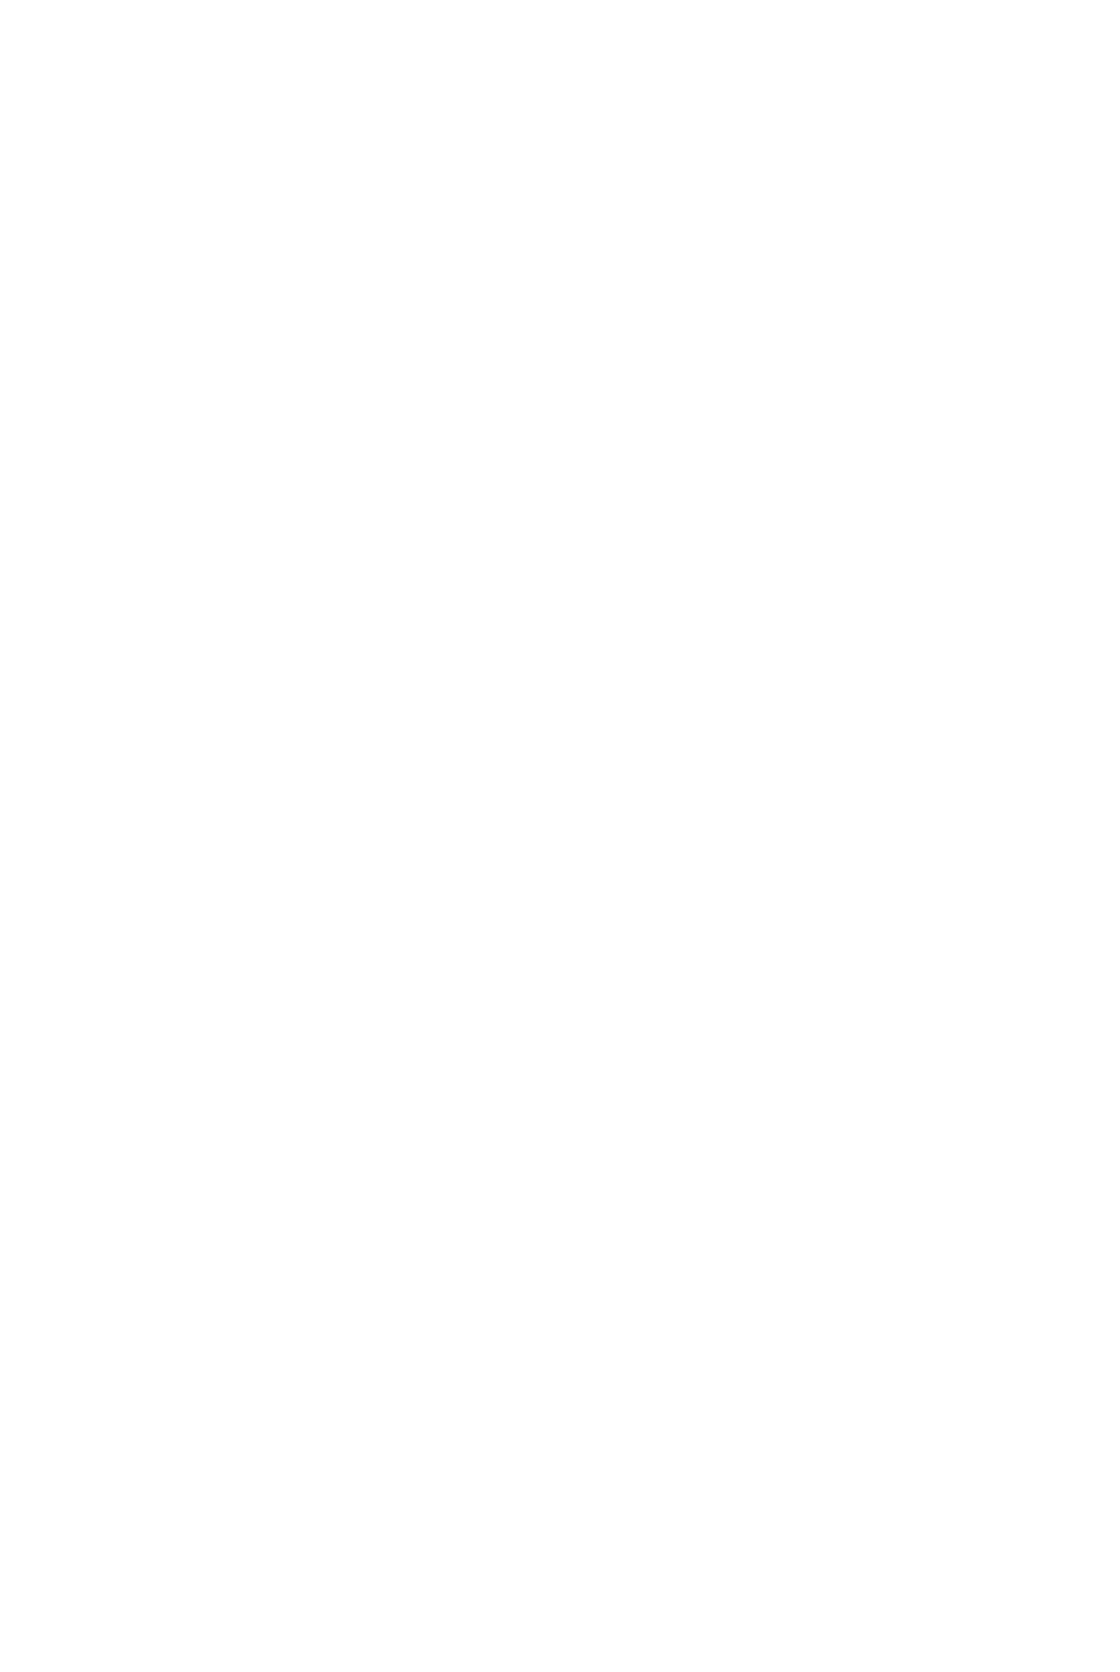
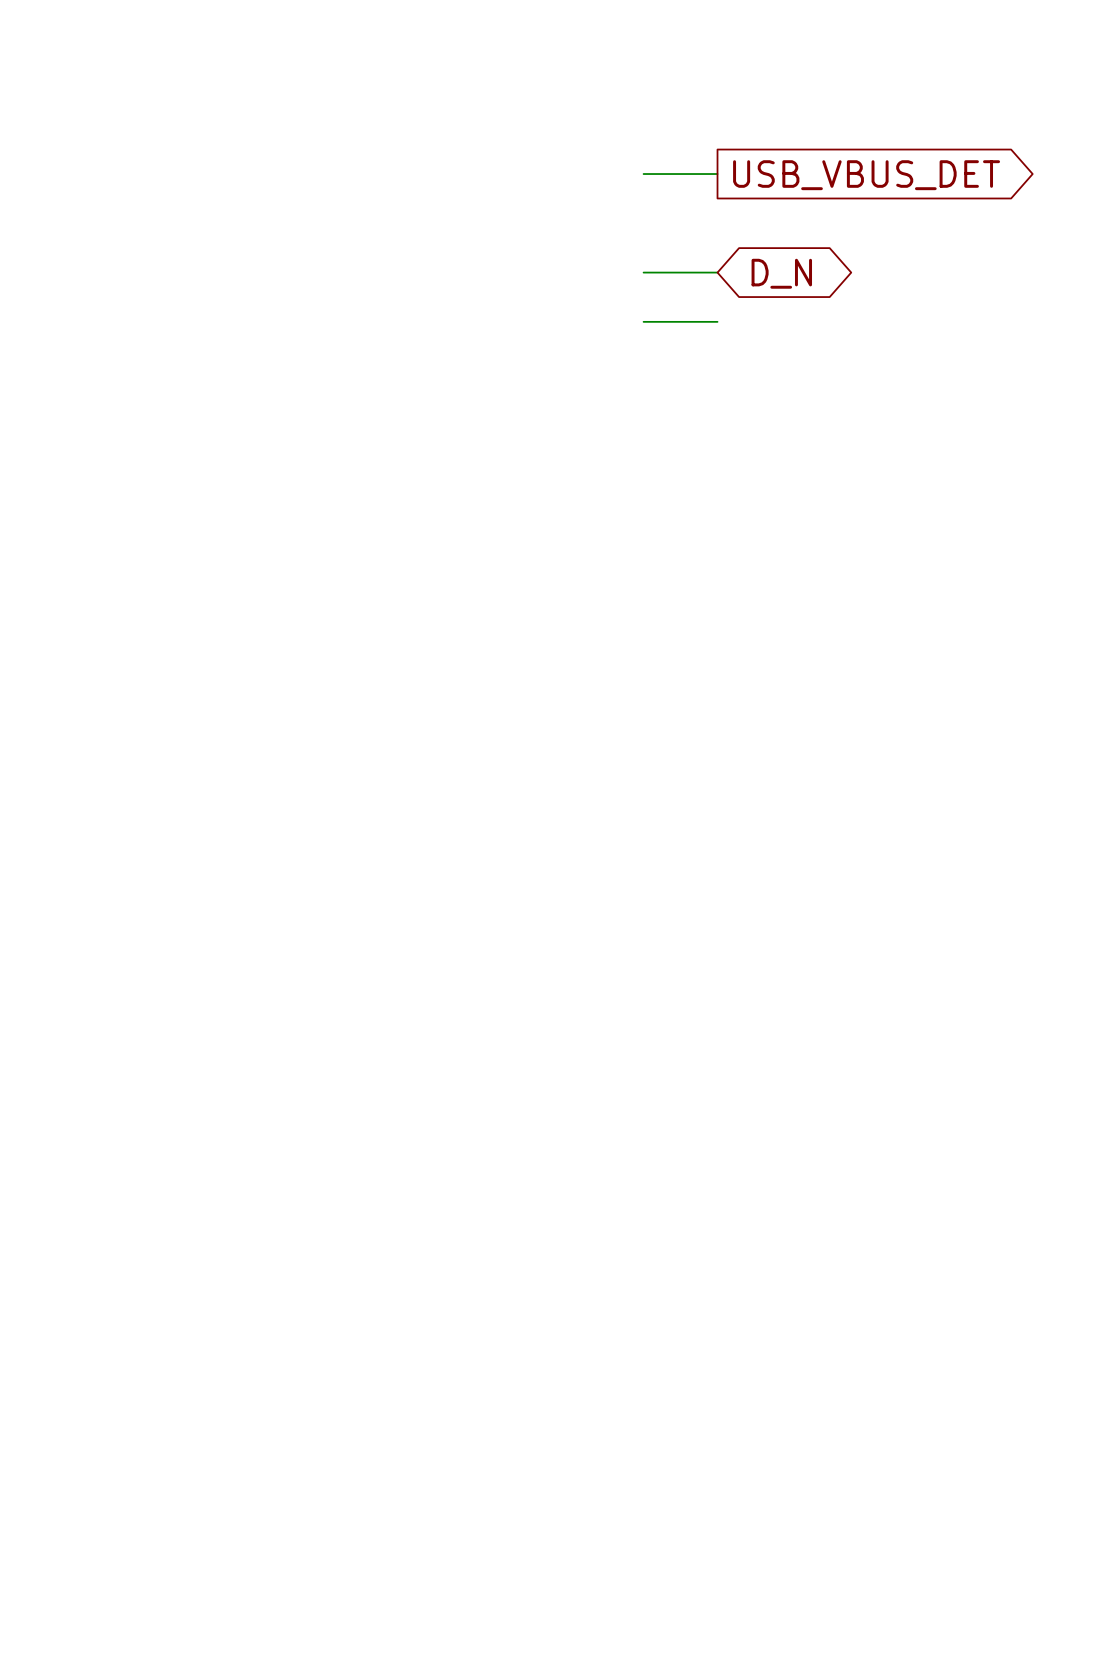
wire: none -> (643, 174) (717, 174)
global label: none -> USB_VBUS_DET (866, 175)
wire: none -> (643, 272) (717, 272)
global label: none -> D_N (781, 273)
wire: none -> (643, 321) (717, 321)

